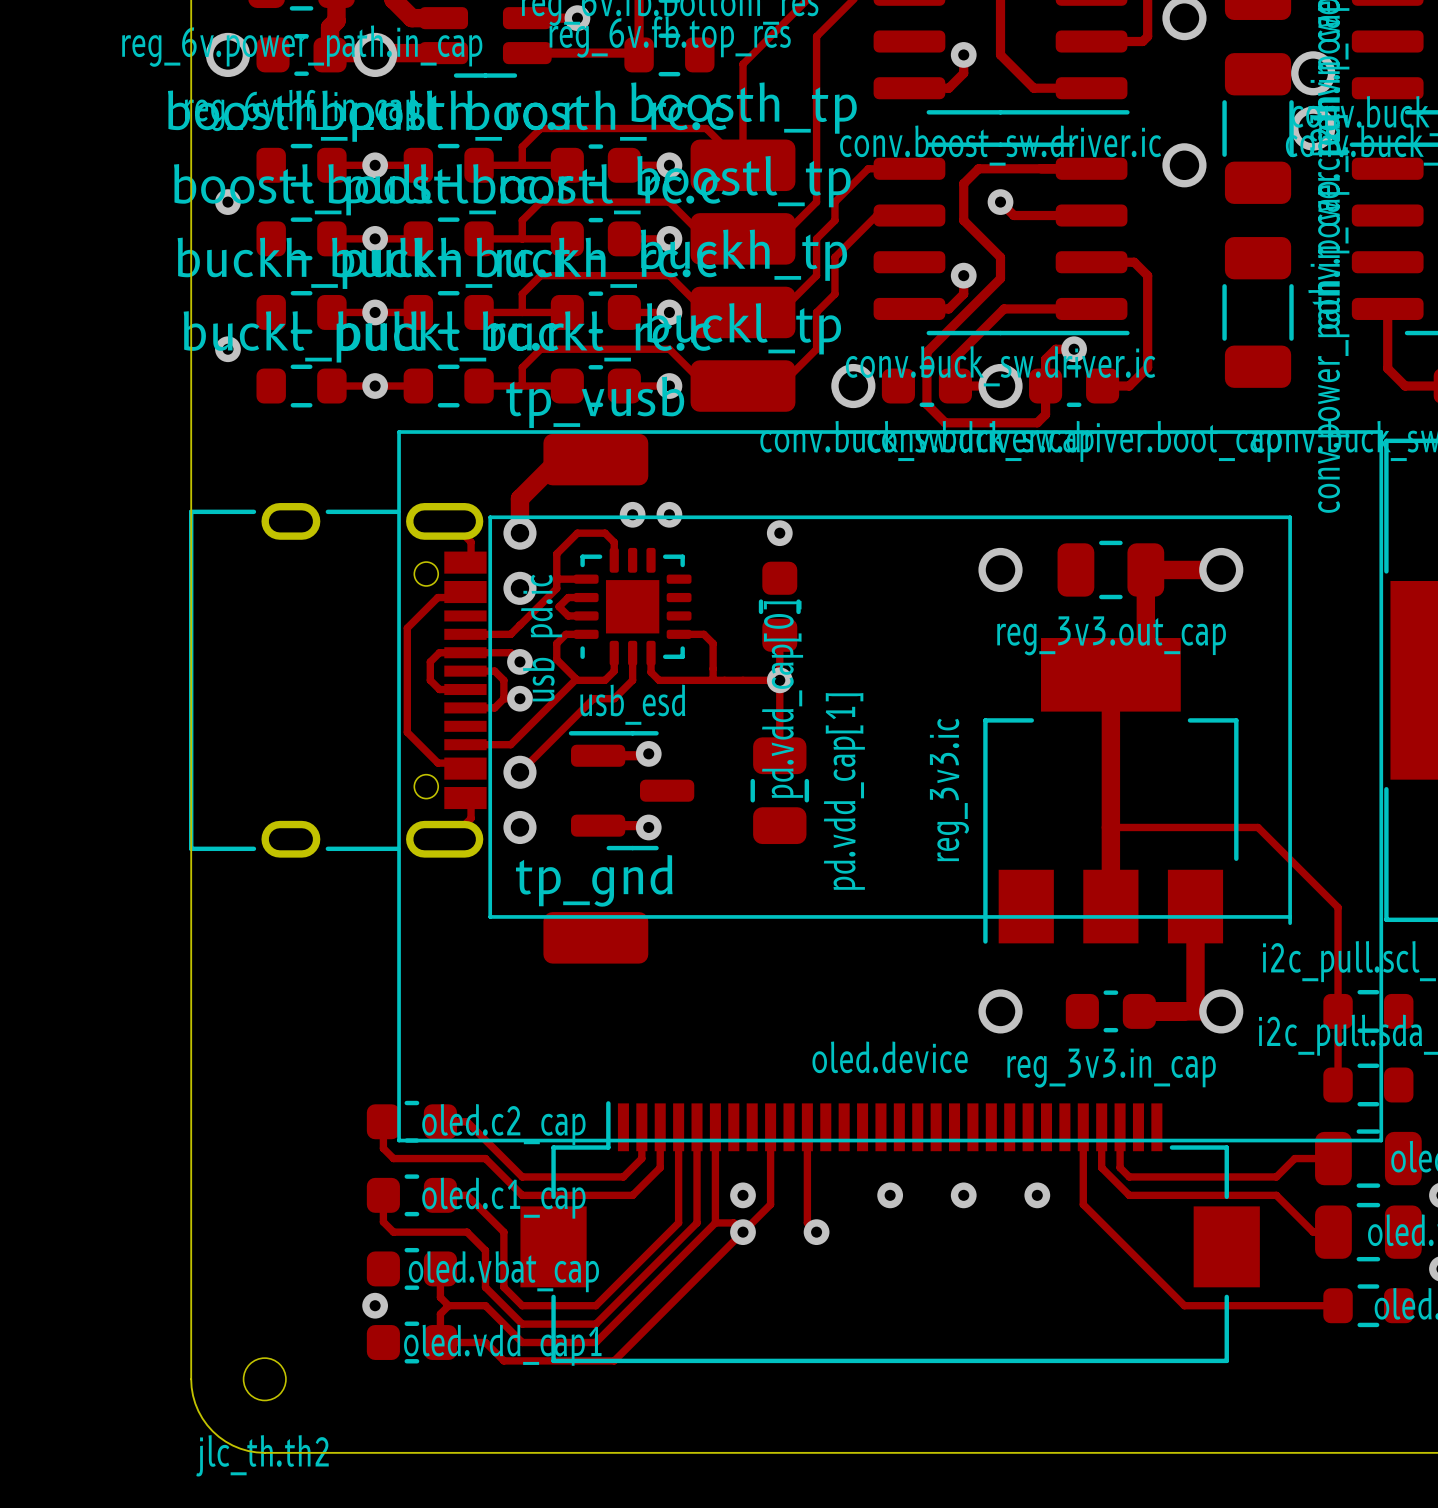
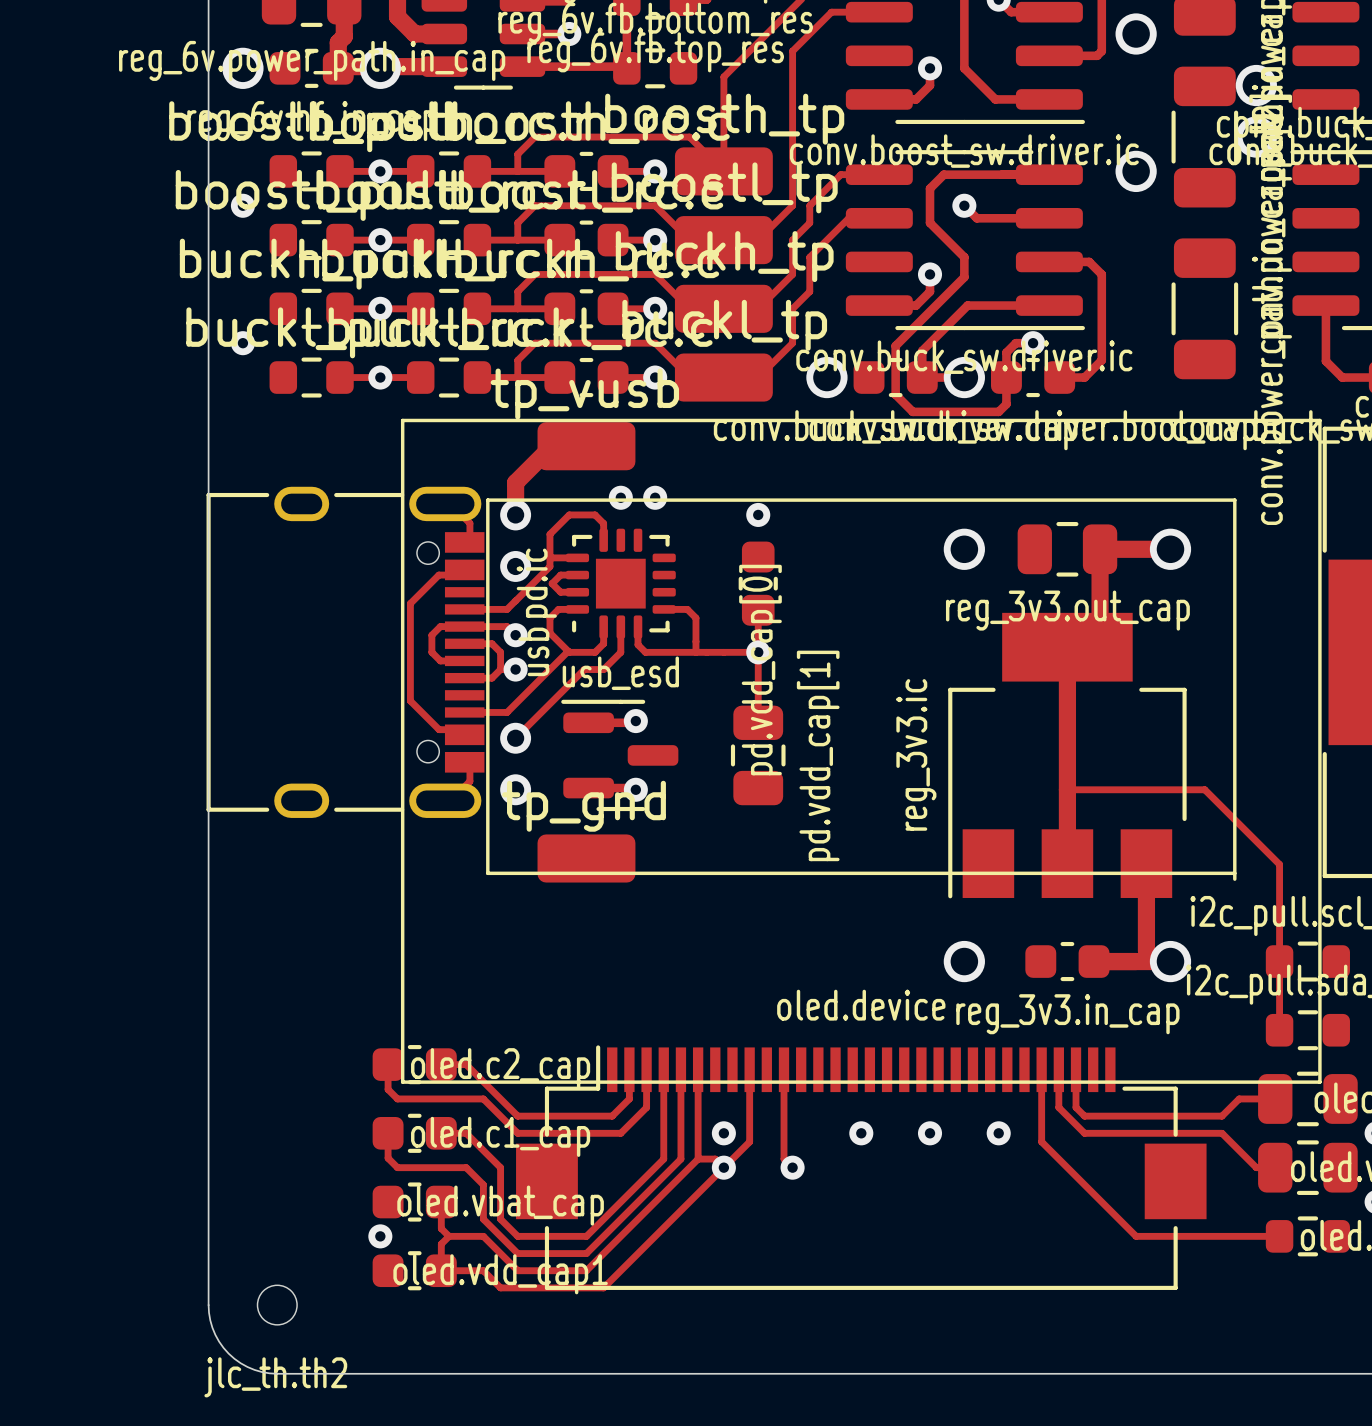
tp_gnd position: (595, 937) -> (586, 858)

